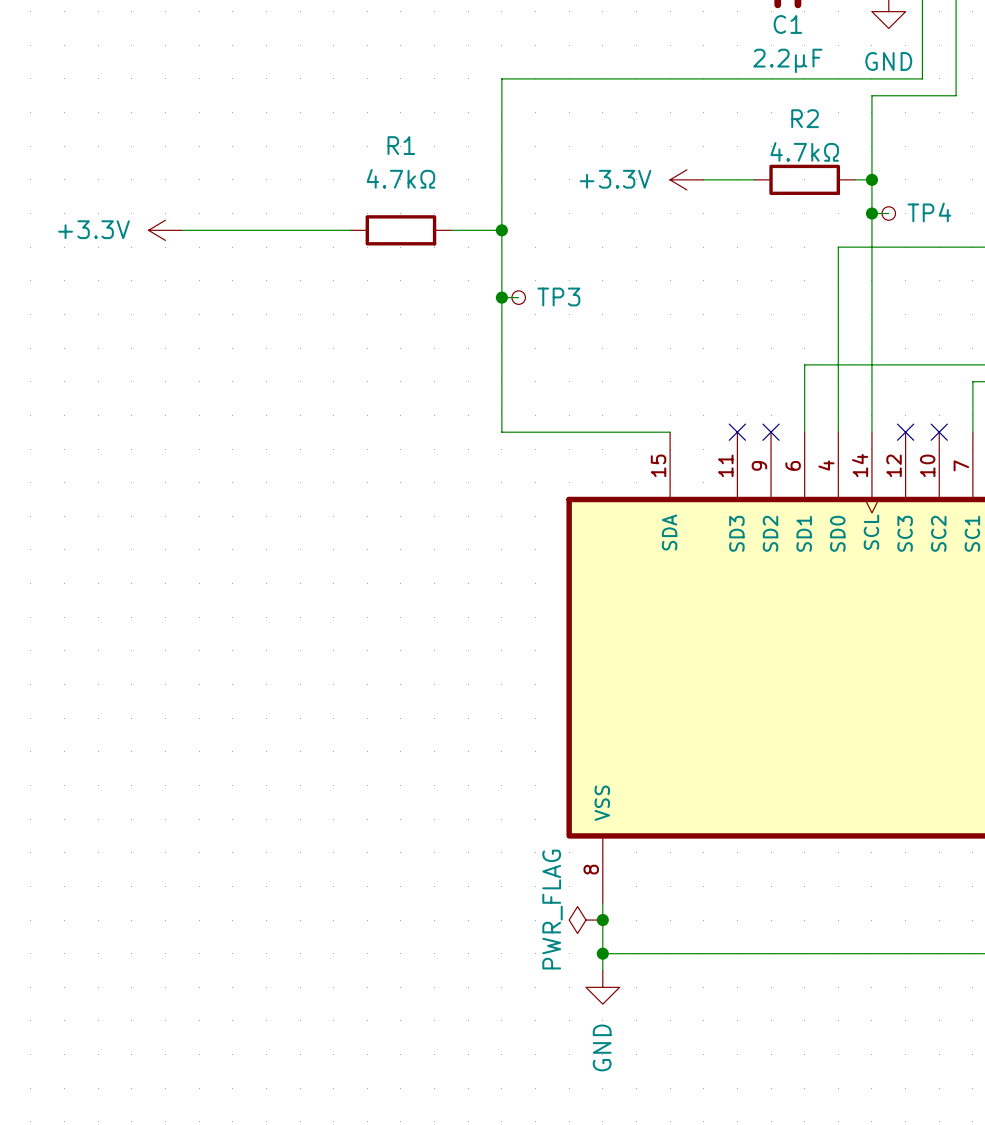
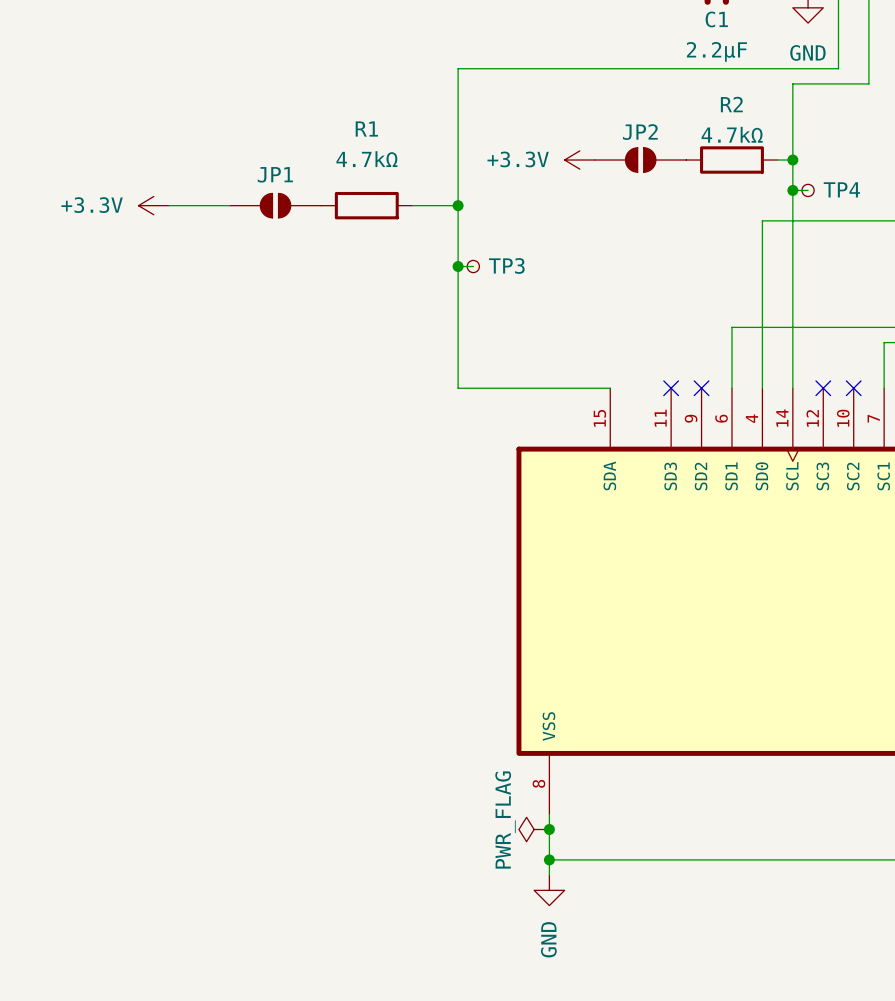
power symbol position: +3.3V (686, 179) -> +3.3V (579, 160)
JP2: none -> (640, 160)
JP1: none -> (275, 205)

